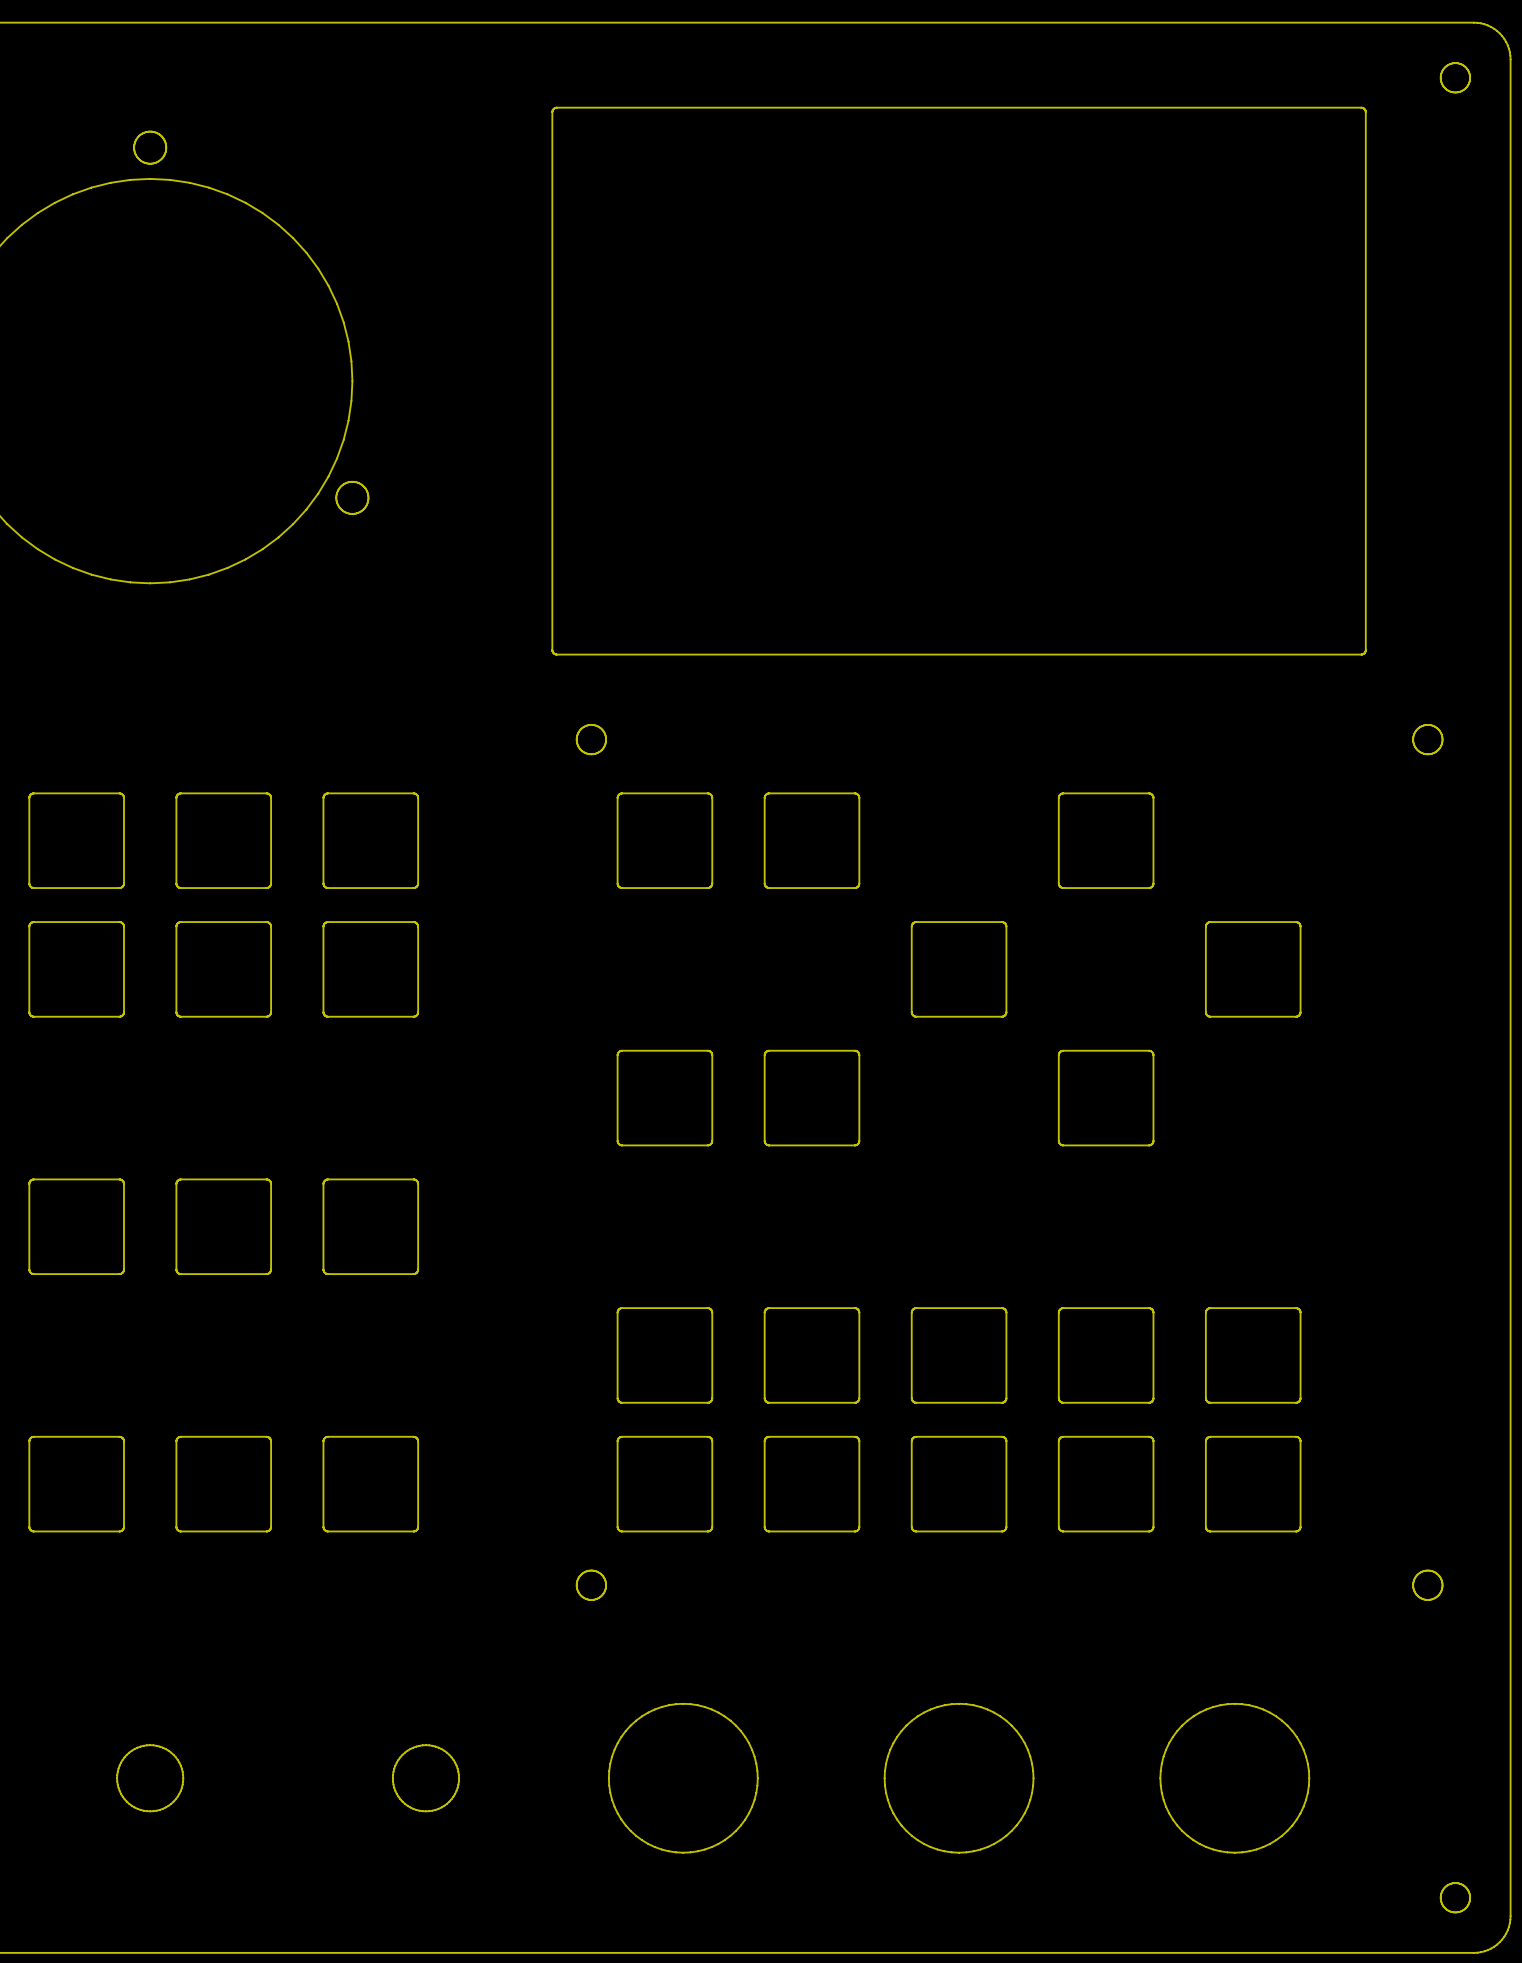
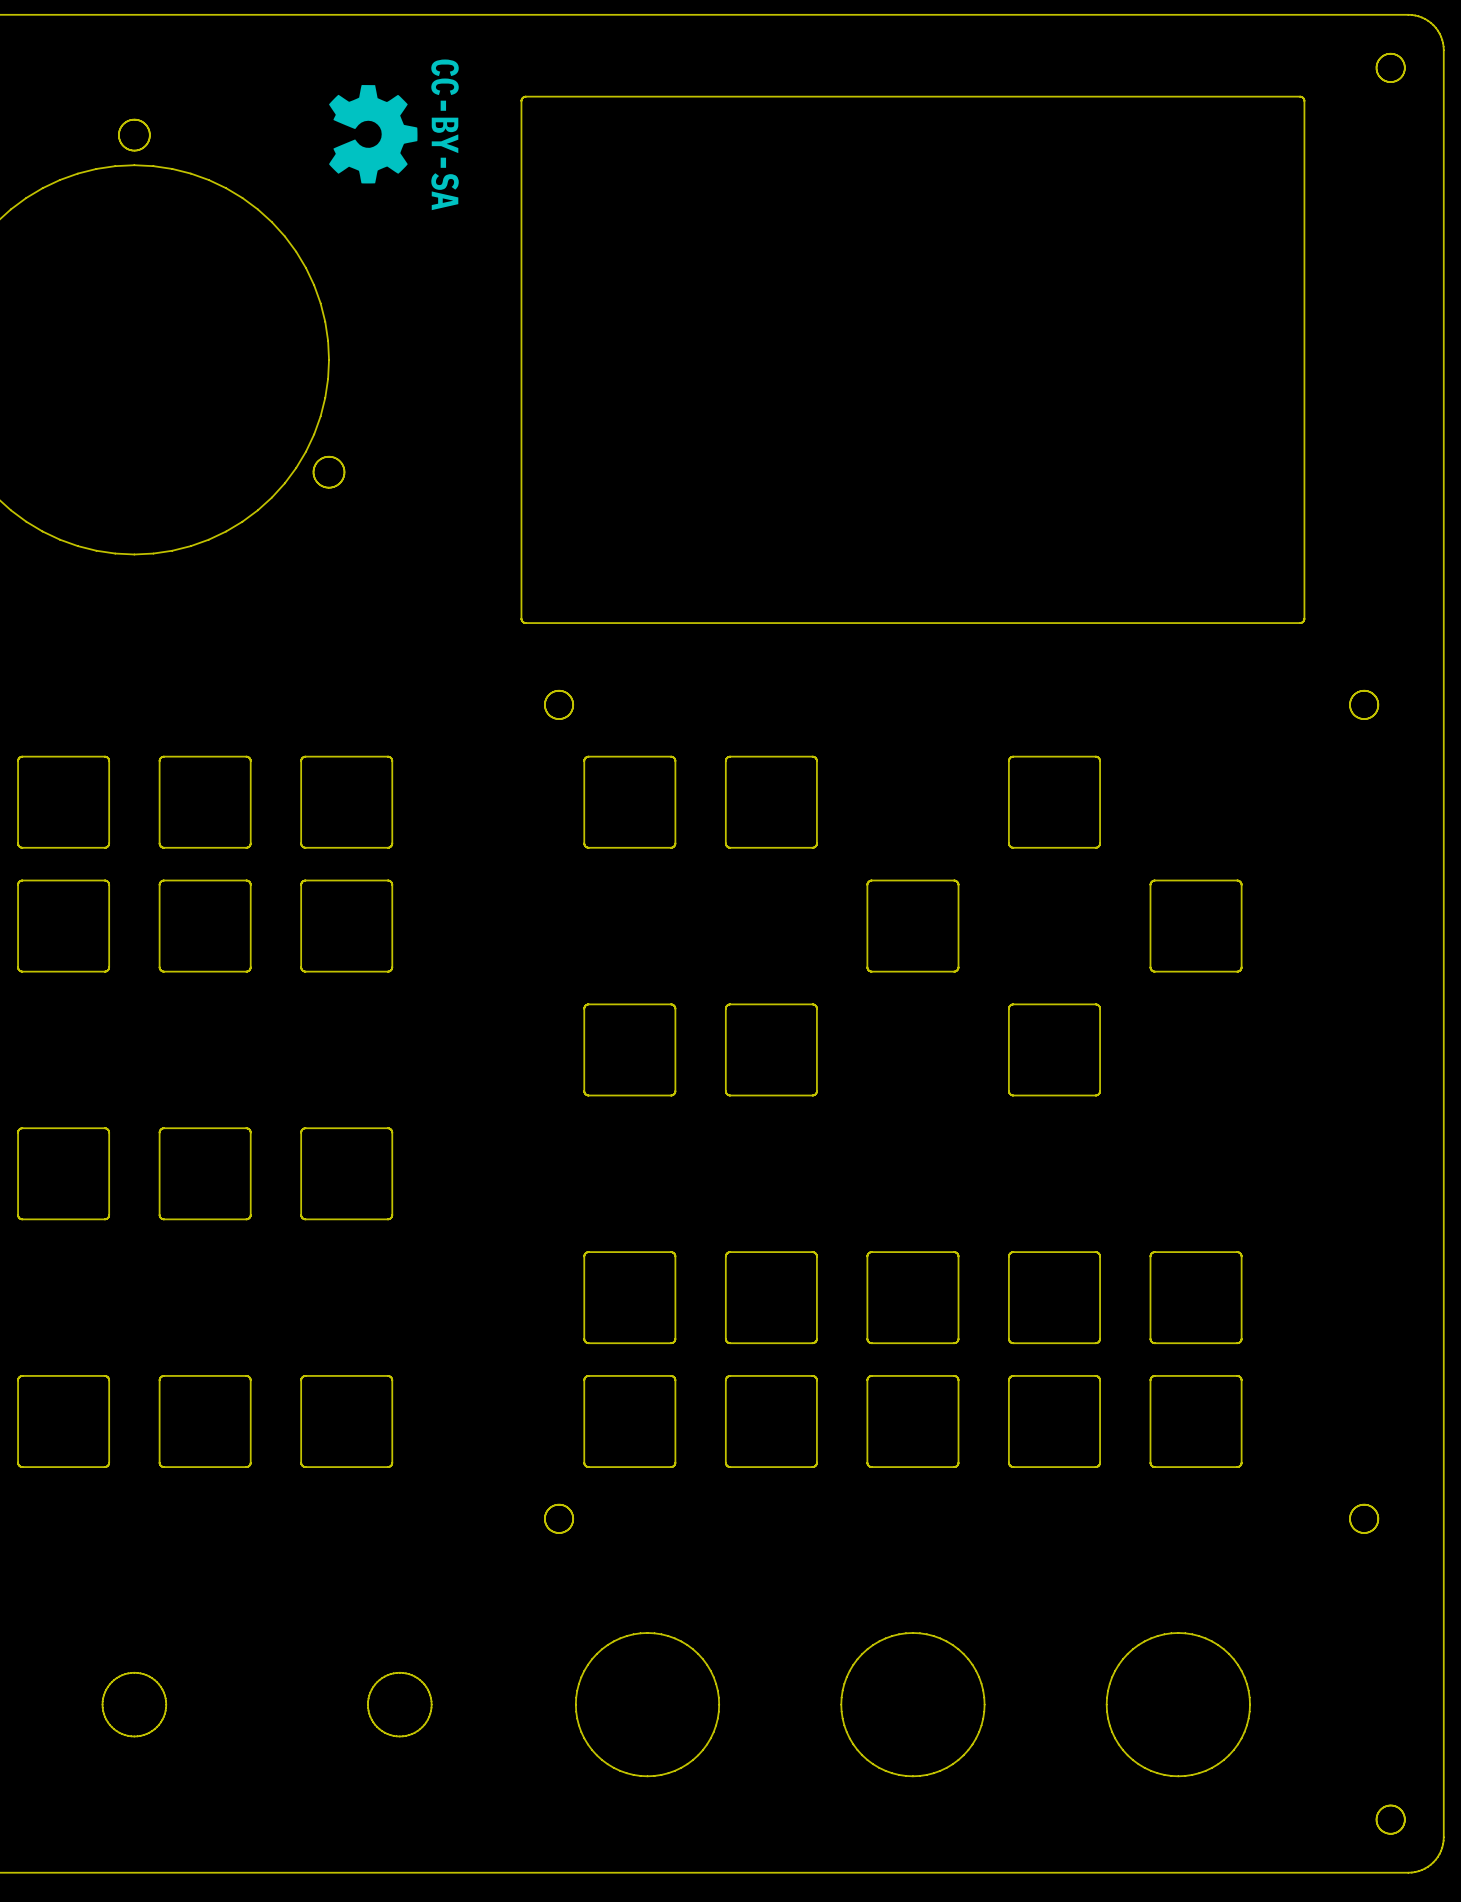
drawing: none -> [329, 85, 418, 184]
text: none -> CC-BY-SA (445, 134)

